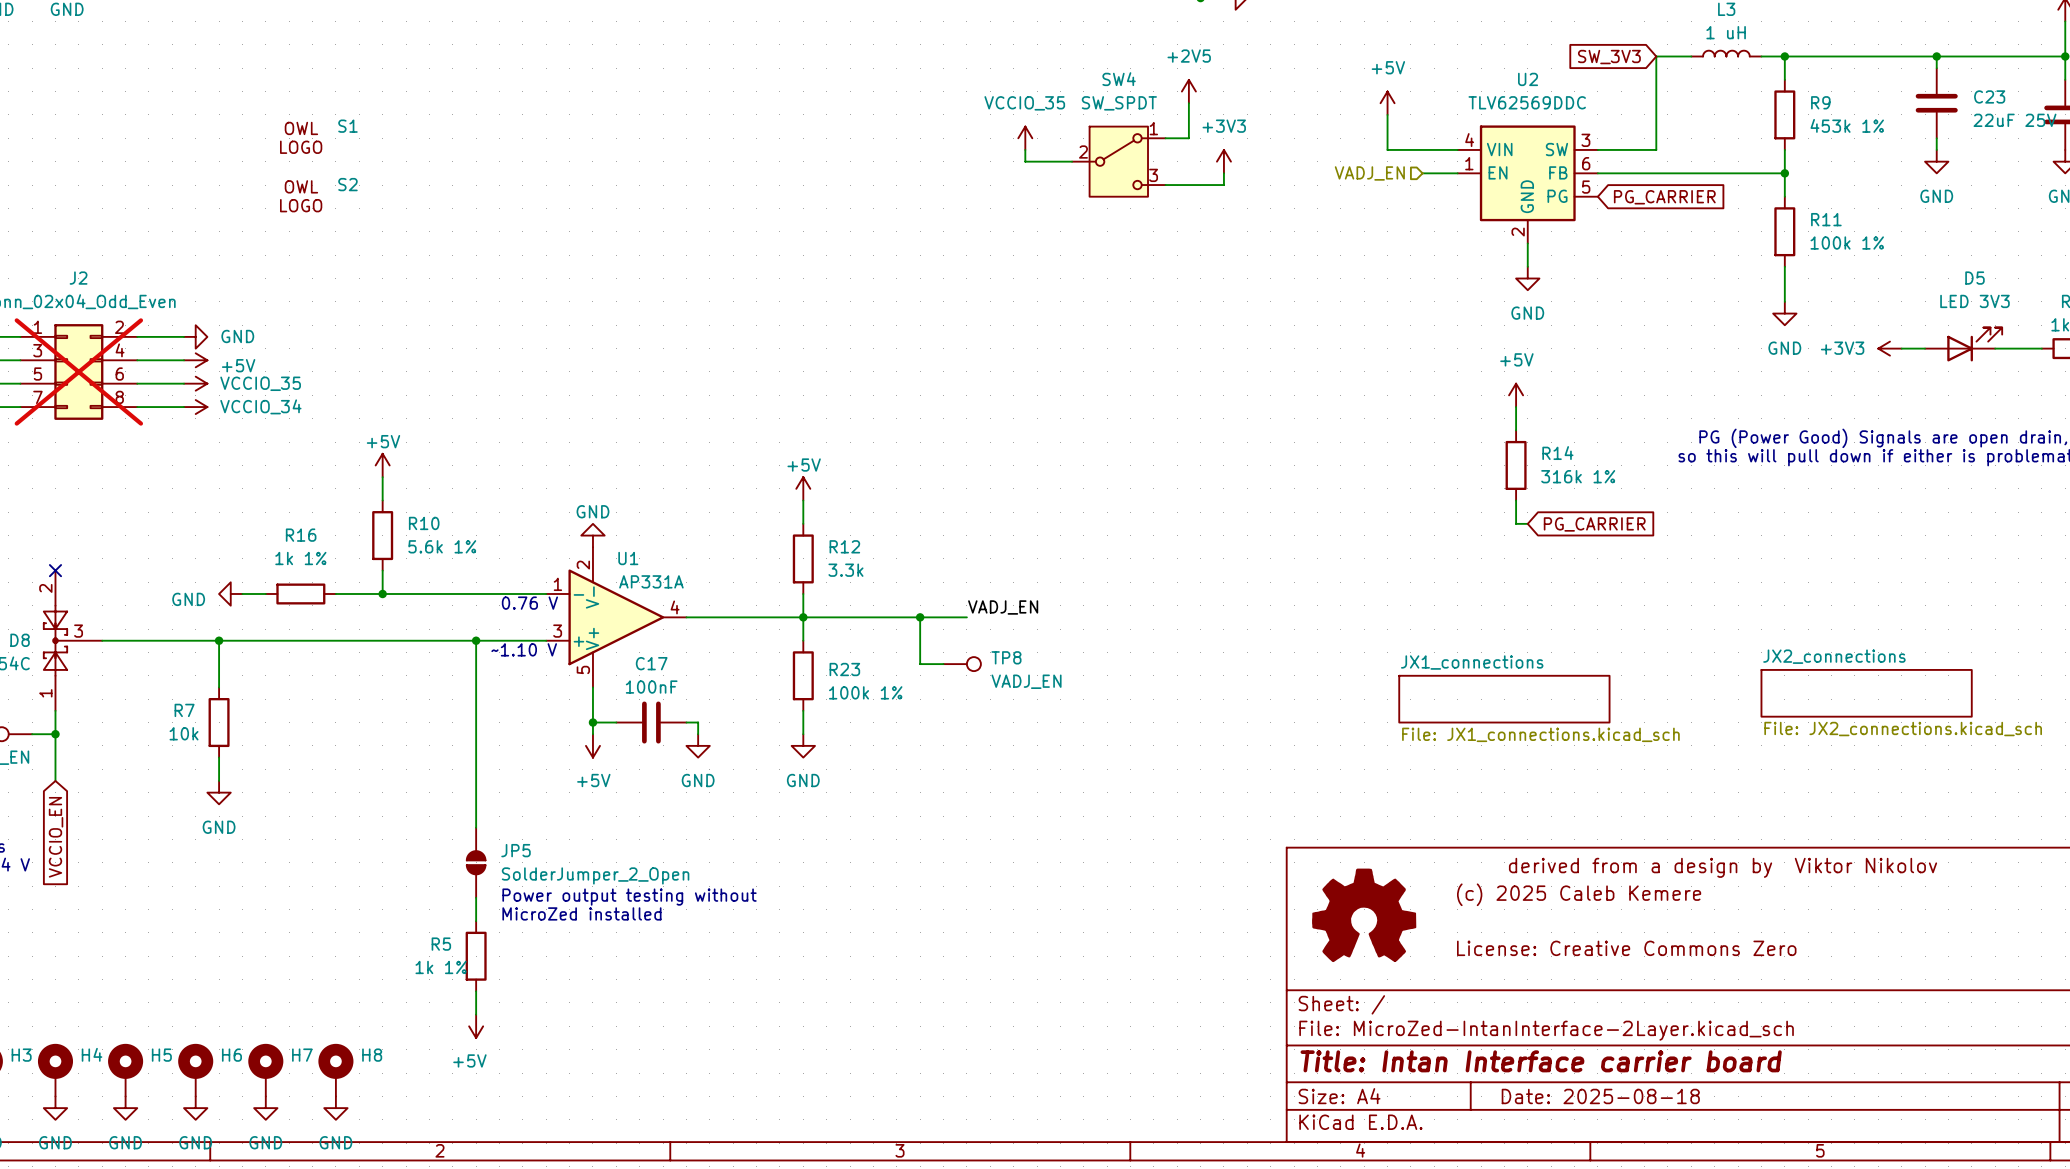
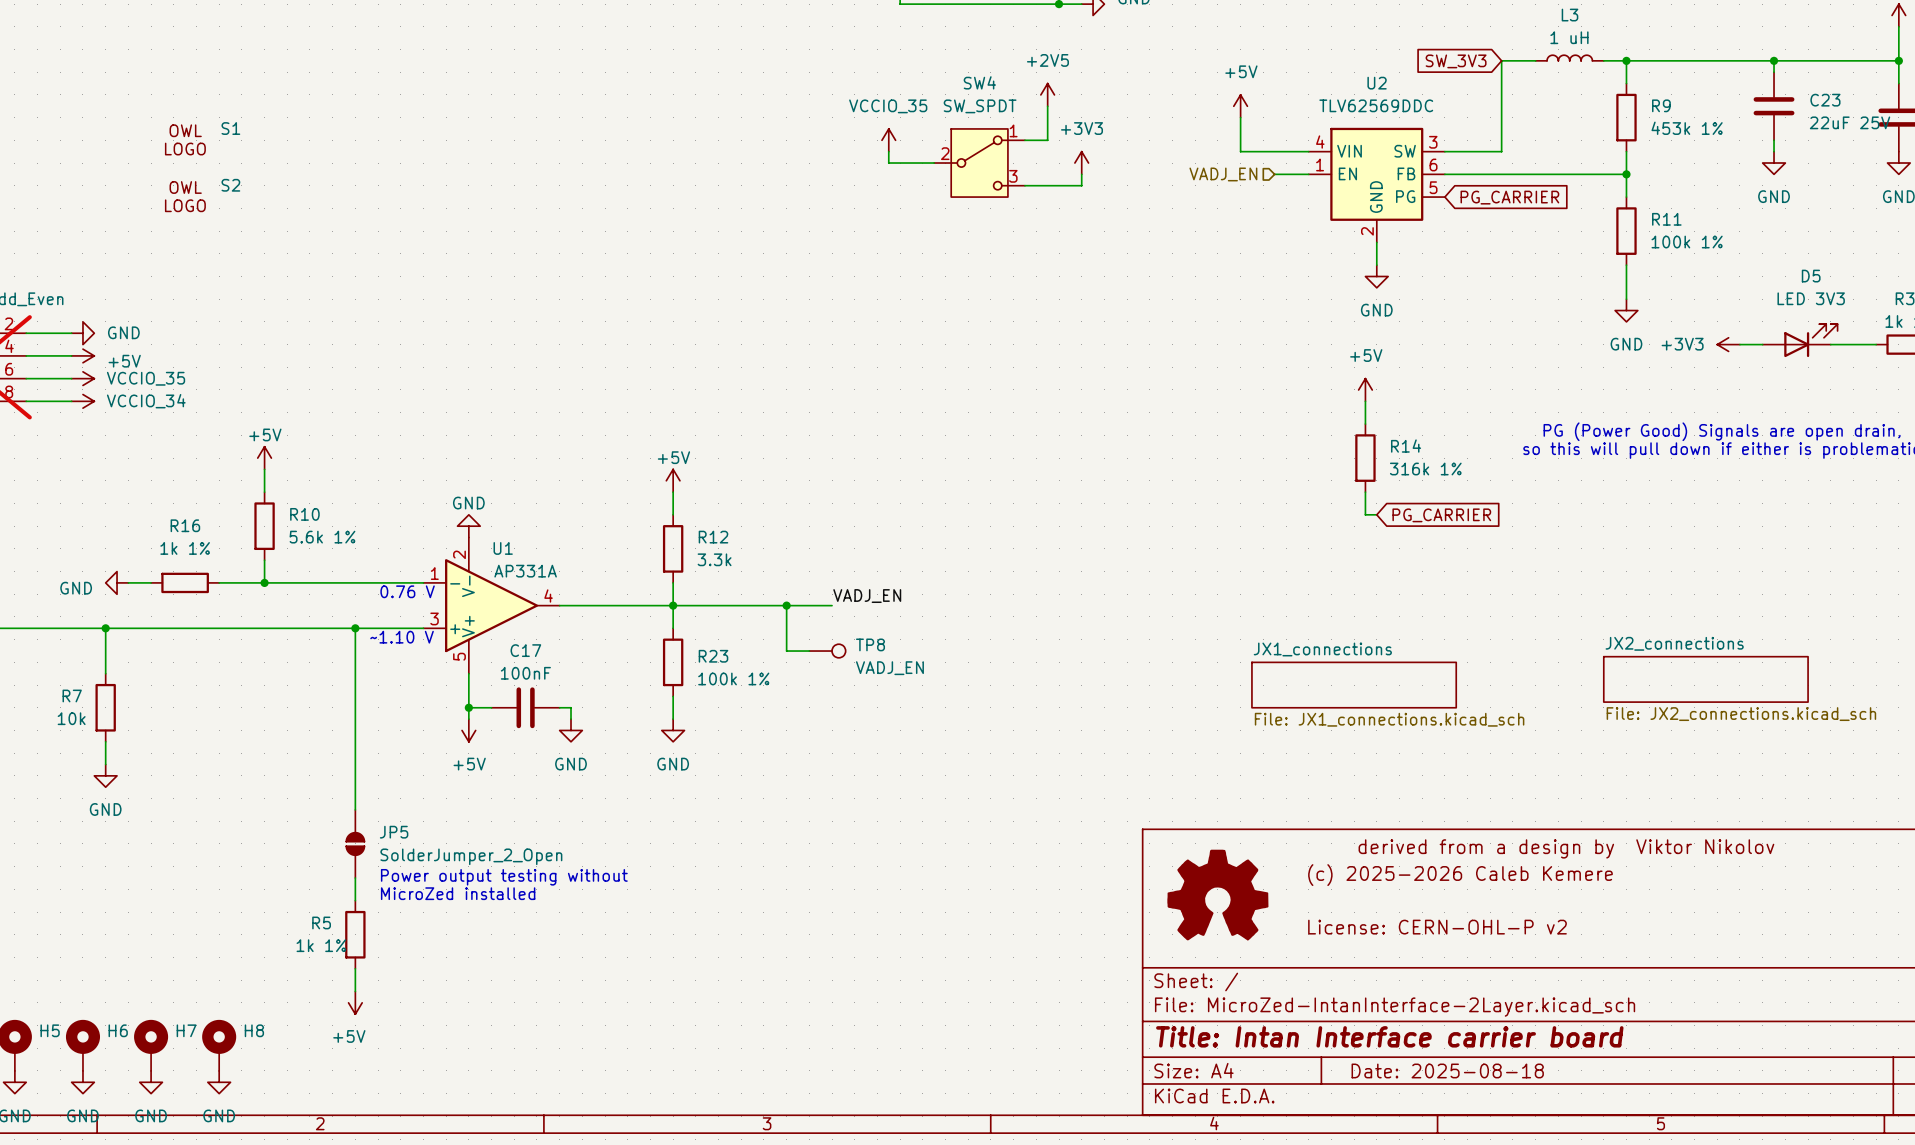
title block: (c) 2025 Caleb Kemere (1579, 894) -> (c) 2025-2026 Caleb Kemere (1460, 875)
title block: License: Creative Commons Zero (1626, 948) -> License: CERN-OHL-P v2 (1437, 927)

